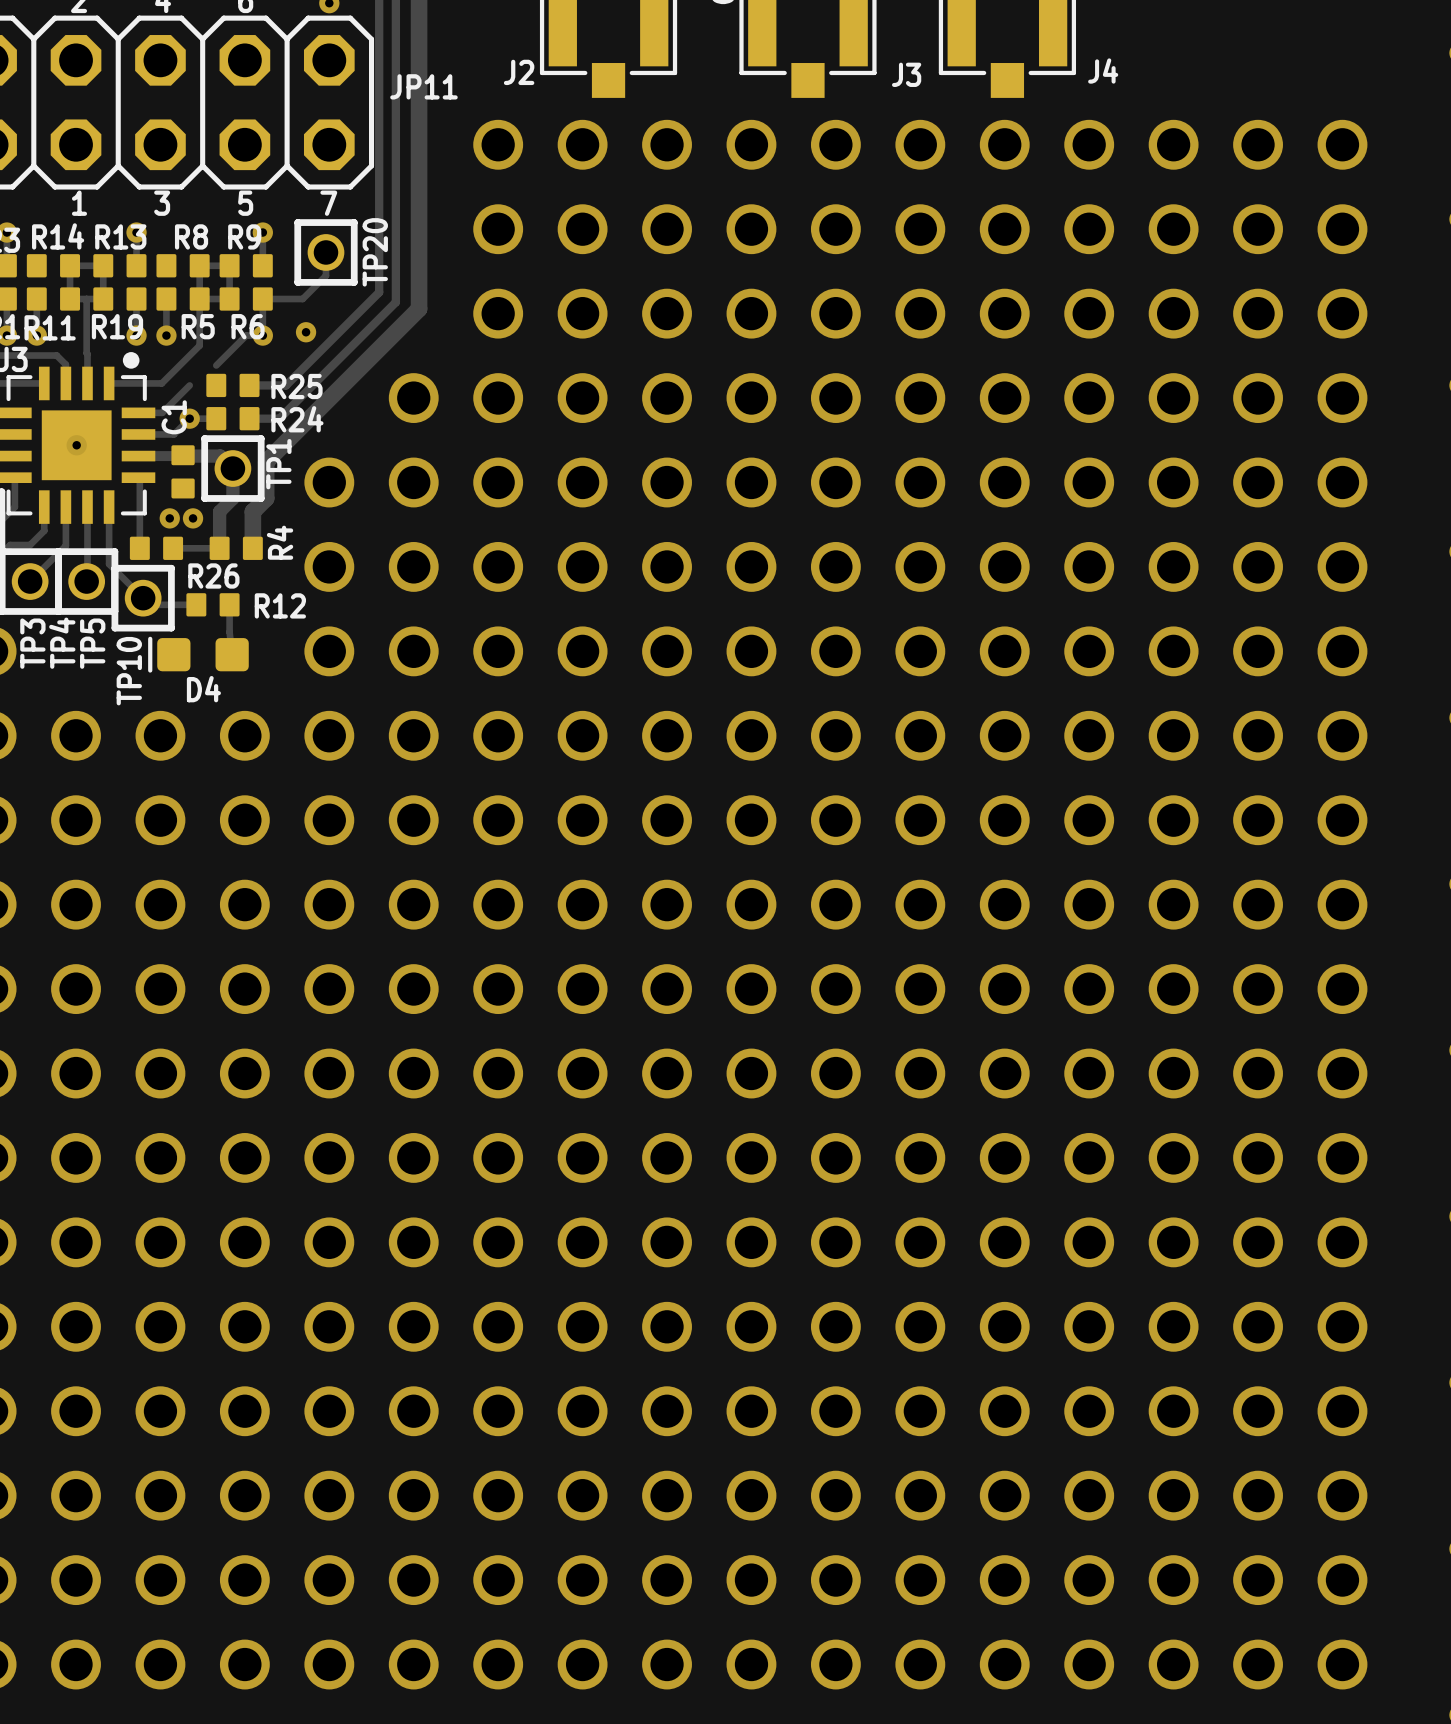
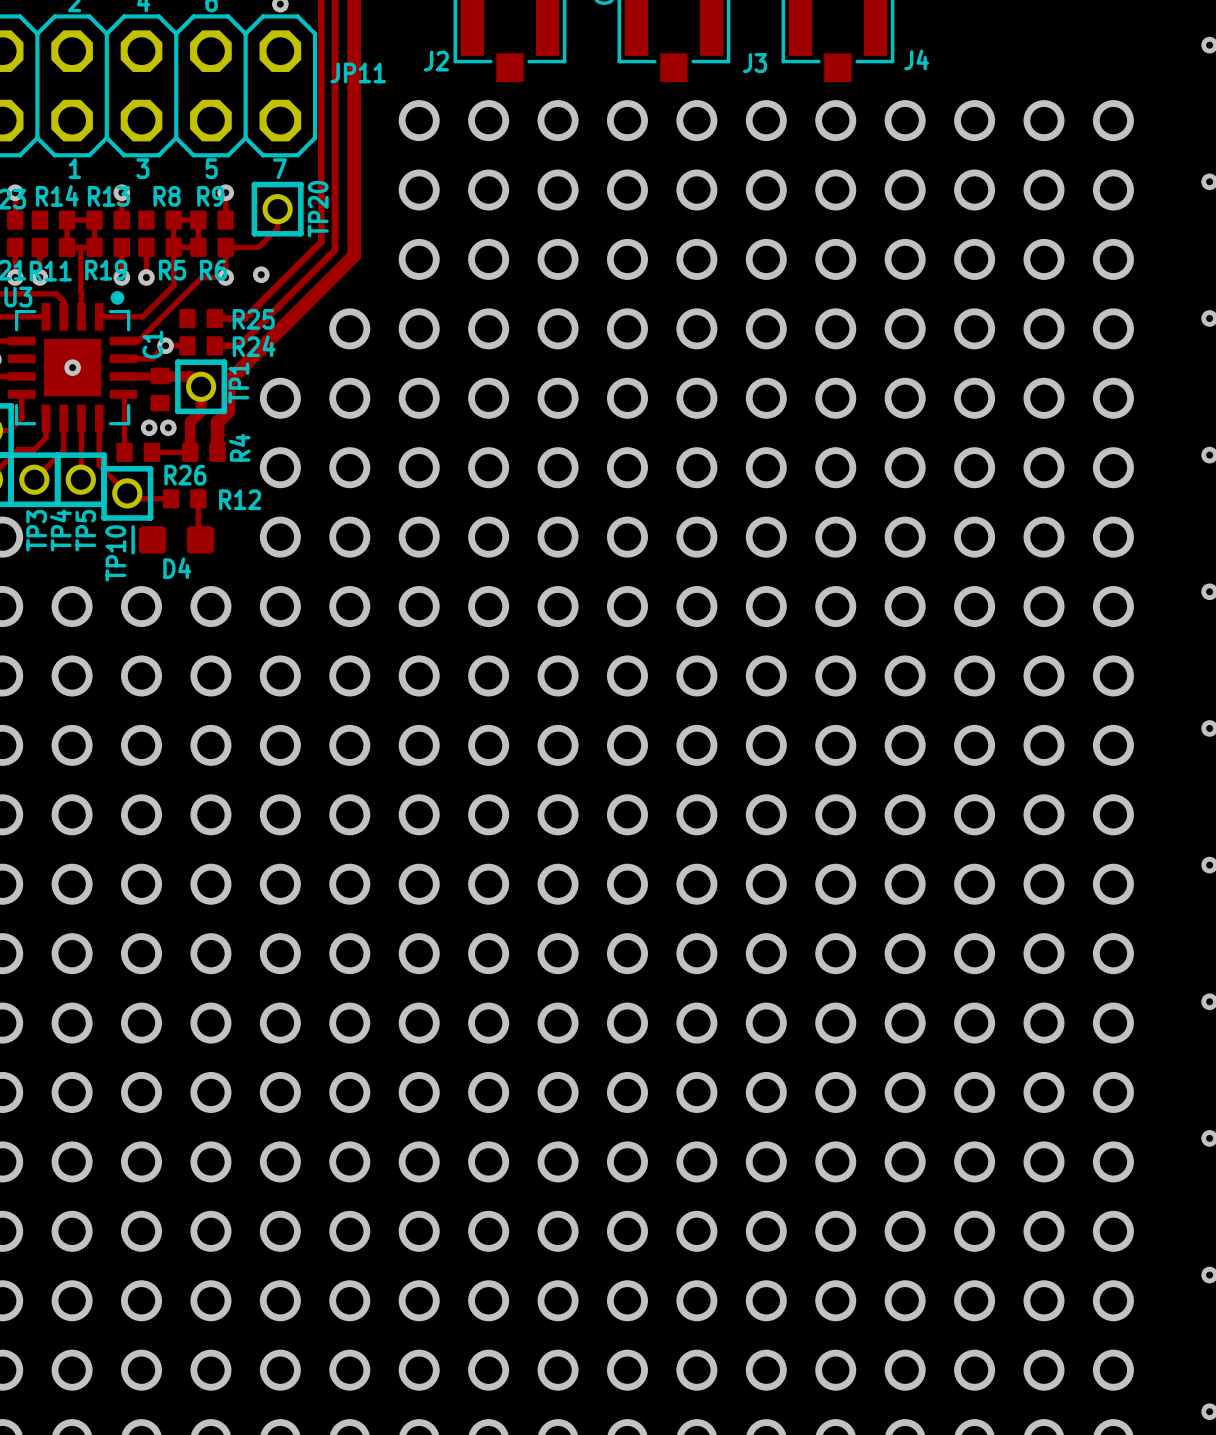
track: (246, 335) (216, 365) -> none
track: (189, 385) (162, 412) (156, 412) -> (212, 277) (201, 277) (138, 341)

